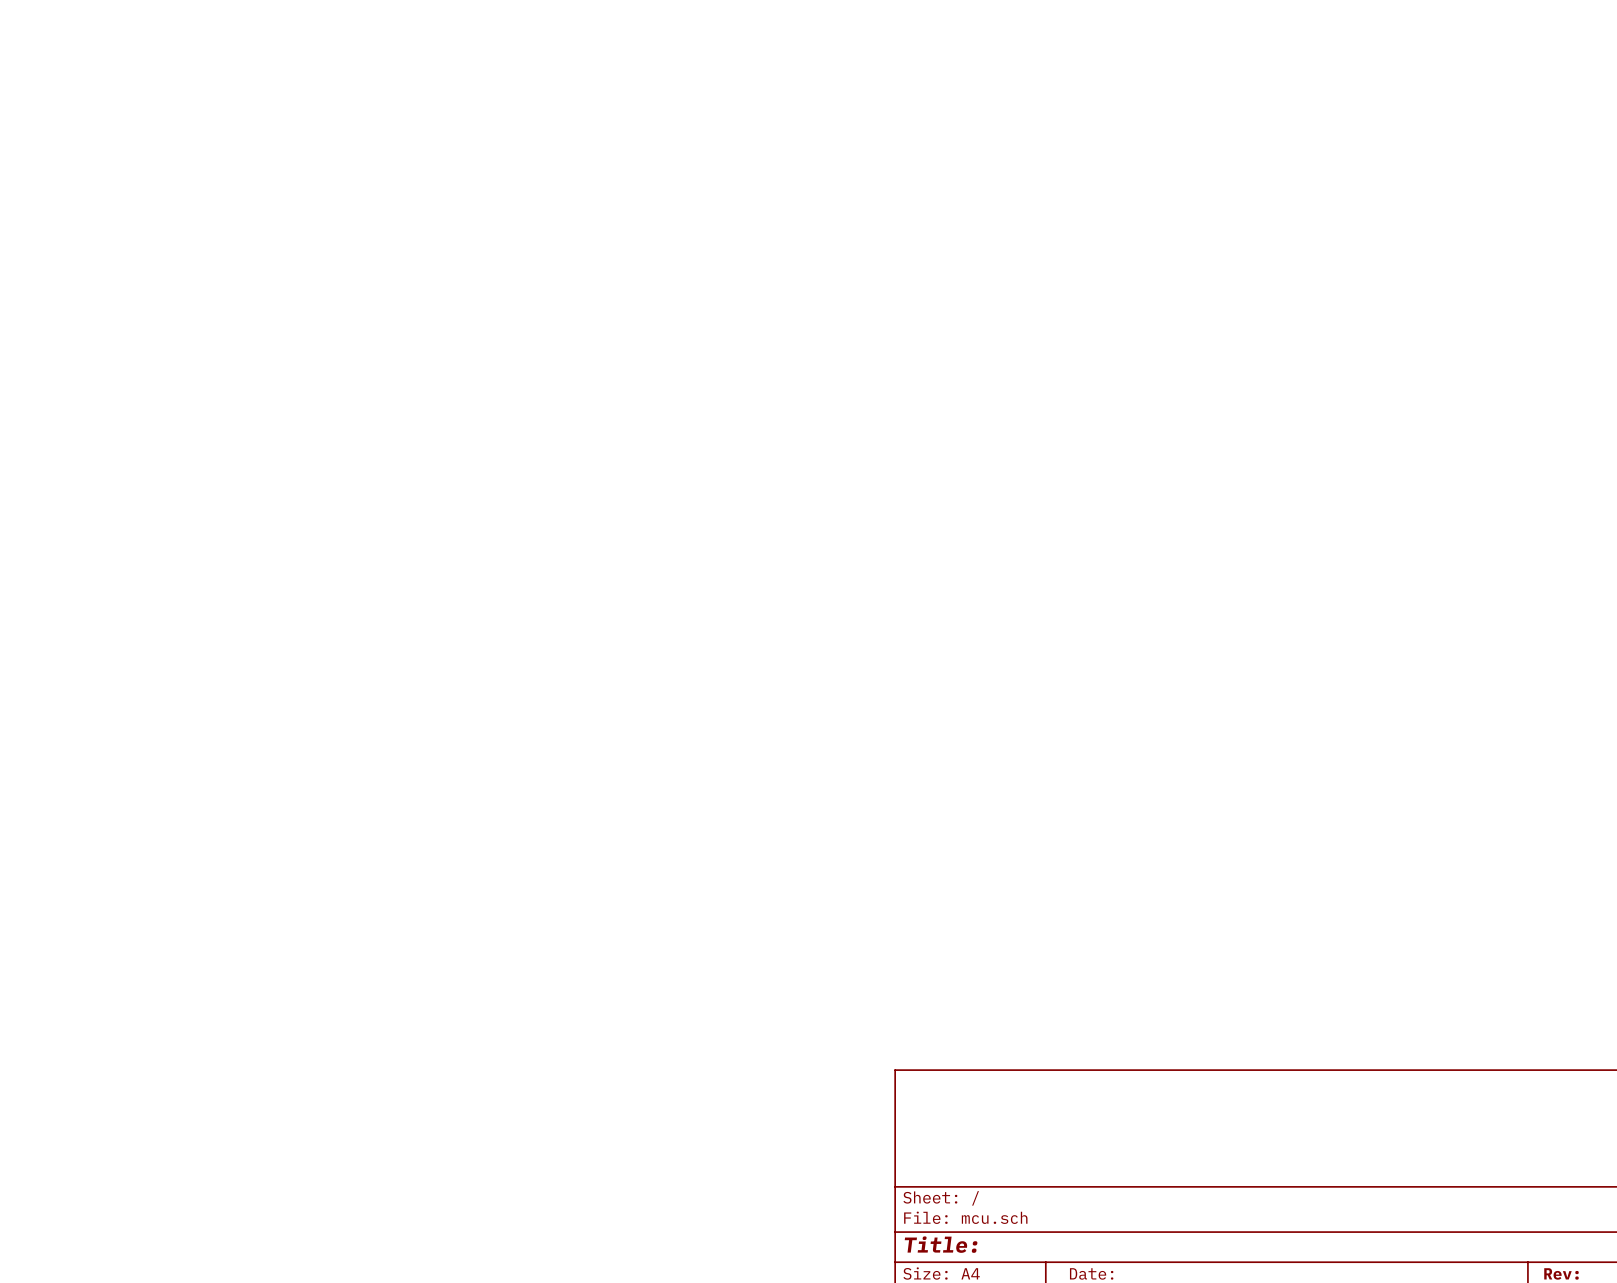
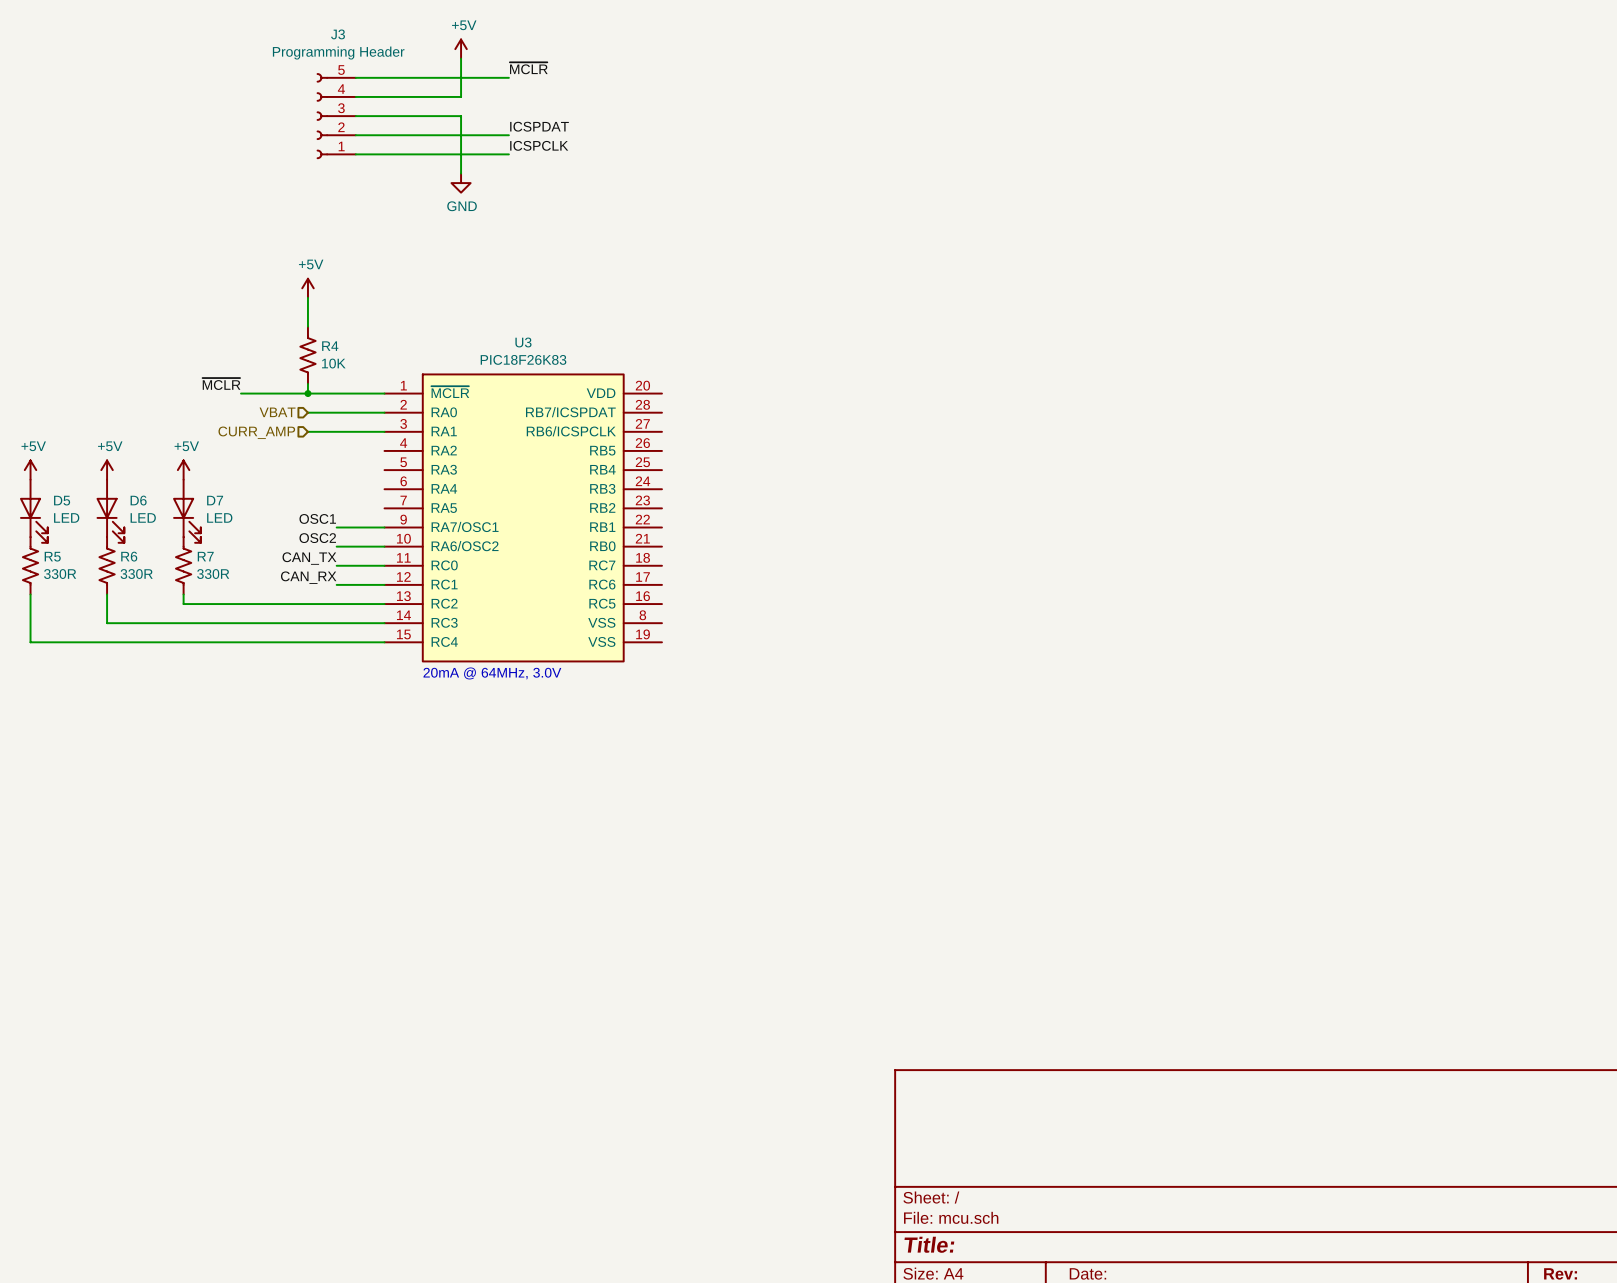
power symbol: none -> +5V (461, 49)
wire: none -> (461, 58) (461, 96) (355, 96)
label: none -> ~{MCLR} (528, 68)
wire: none -> (355, 77) (508, 77)
J3: none -> Programming Header (336, 116)
wire: none -> (355, 116) (461, 116) (461, 173)
label: none -> ICSPDAT (539, 126)
wire: none -> (355, 135) (508, 135)
label: none -> ICSPCLK (539, 145)
wire: none -> (355, 154) (508, 154)
power symbol: none -> GND (461, 183)
power symbol: none -> +5V (307, 288)
wire: none -> (307, 297) (307, 326)
R4: none -> 10K (307, 355)
wire: none -> (307, 383) (307, 393)
label: none -> ~{MCLR} (221, 383)
wire: none -> (241, 393) (384, 393)
junction: none -> (307, 393)
hierarchical label: none -> VBAT (277, 412)
wire: none -> (307, 412) (384, 412)
wire: none -> (307, 431) (384, 431)
hierarchical label: none -> CURR_AMP (256, 432)
power symbol: none -> +5V (30, 470)
power symbol: none -> +5V (107, 470)
power symbol: none -> +5V (183, 470)
D5: none -> LED (33, 511)
D6: none -> LED (110, 511)
D7: none -> LED (187, 511)
U3: none -> PIC18F26K83 (523, 517)
label: none -> OSC1 (317, 518)
wire: none -> (336, 527) (384, 527)
label: none -> OSC2 (317, 538)
wire: none -> (336, 546) (384, 546)
label: none -> CAN_TX (309, 558)
R5: none -> 330R (30, 565)
R6: none -> 330R (107, 565)
R7: none -> 330R (183, 565)
wire: none -> (336, 565) (384, 565)
label: none -> CAN_RX (308, 577)
wire: none -> (336, 584) (384, 584)
wire: none -> (30, 594) (30, 642) (384, 642)
wire: none -> (107, 594) (107, 623) (384, 623)
wire: none -> (183, 594) (183, 604) (384, 604)
text: none -> 20mA @ 64MHz, 3.0V (492, 673)

